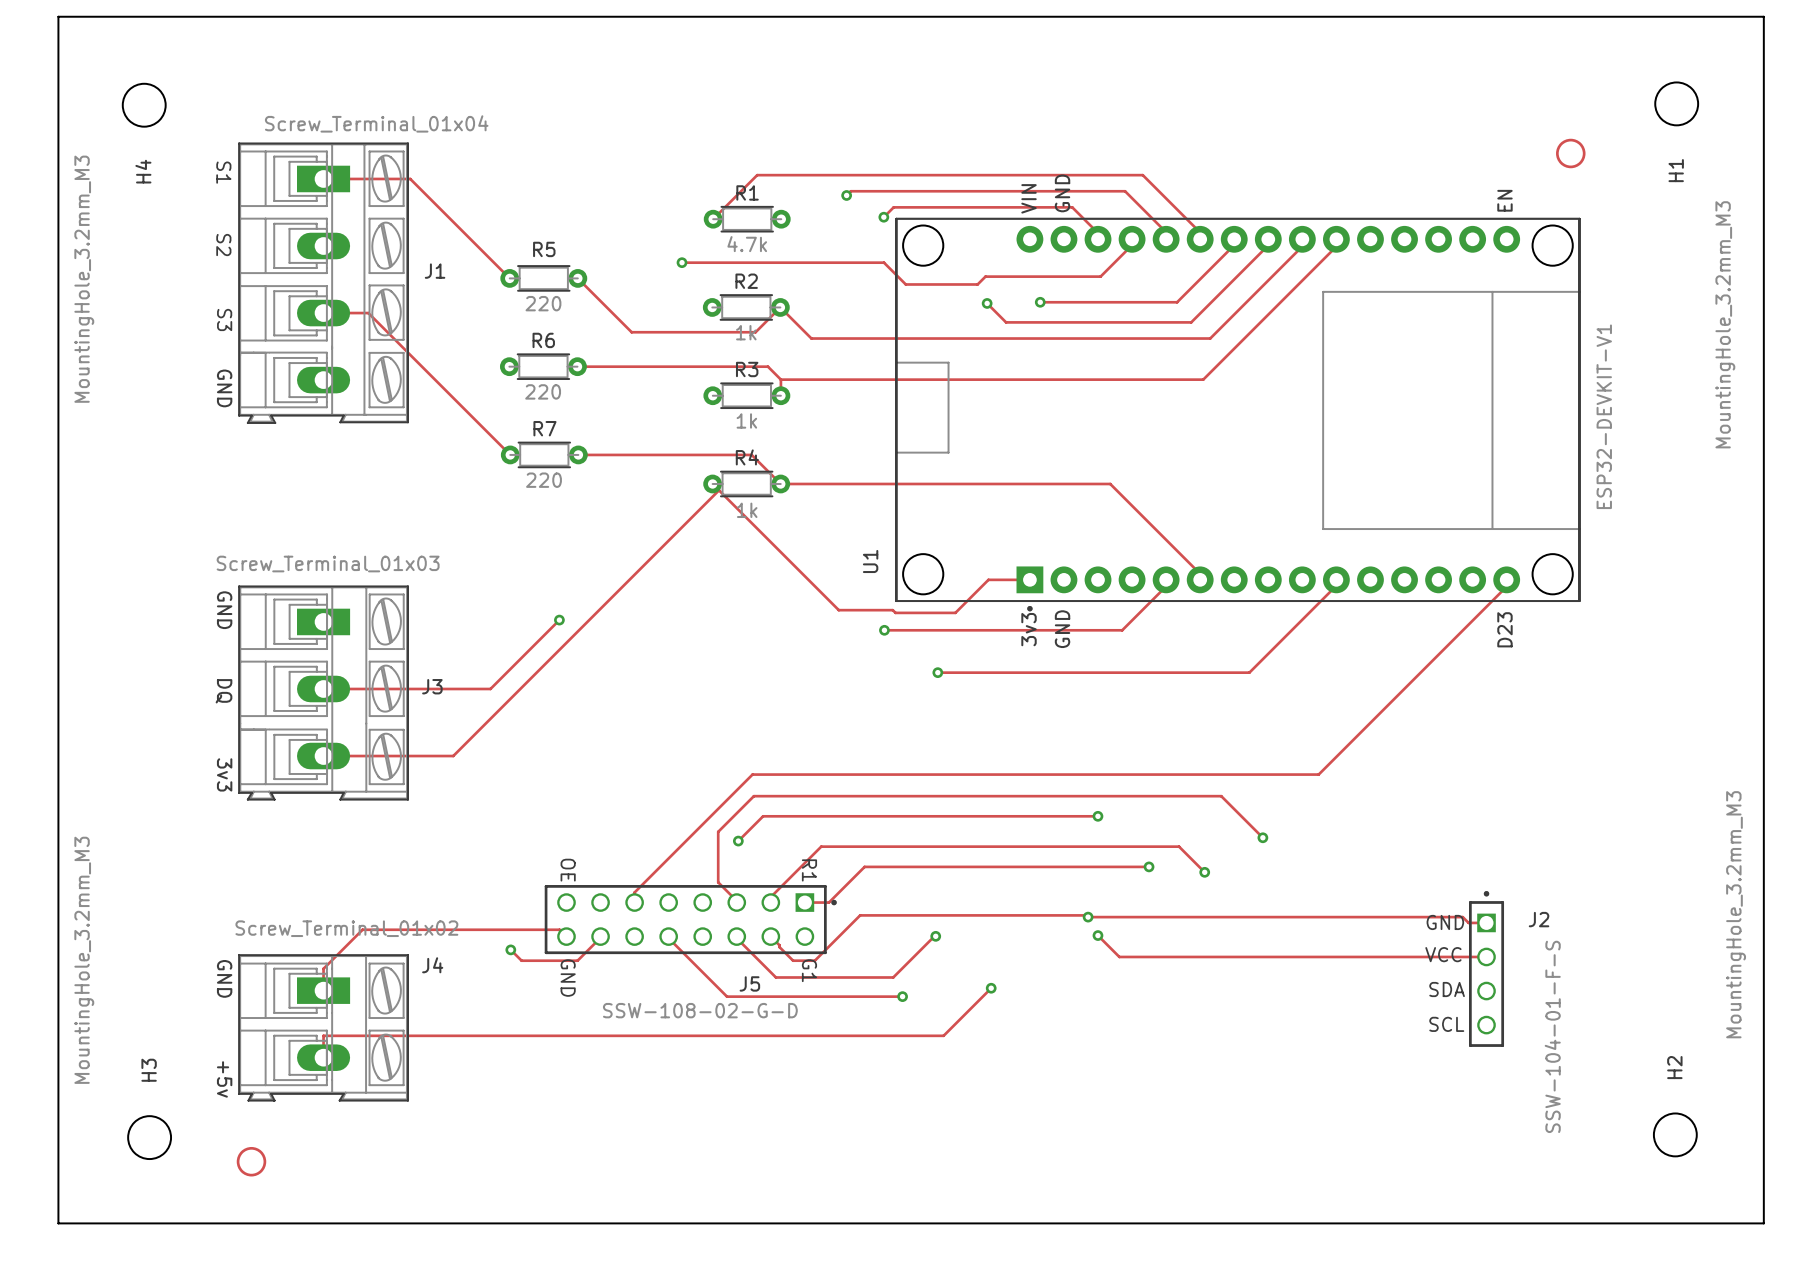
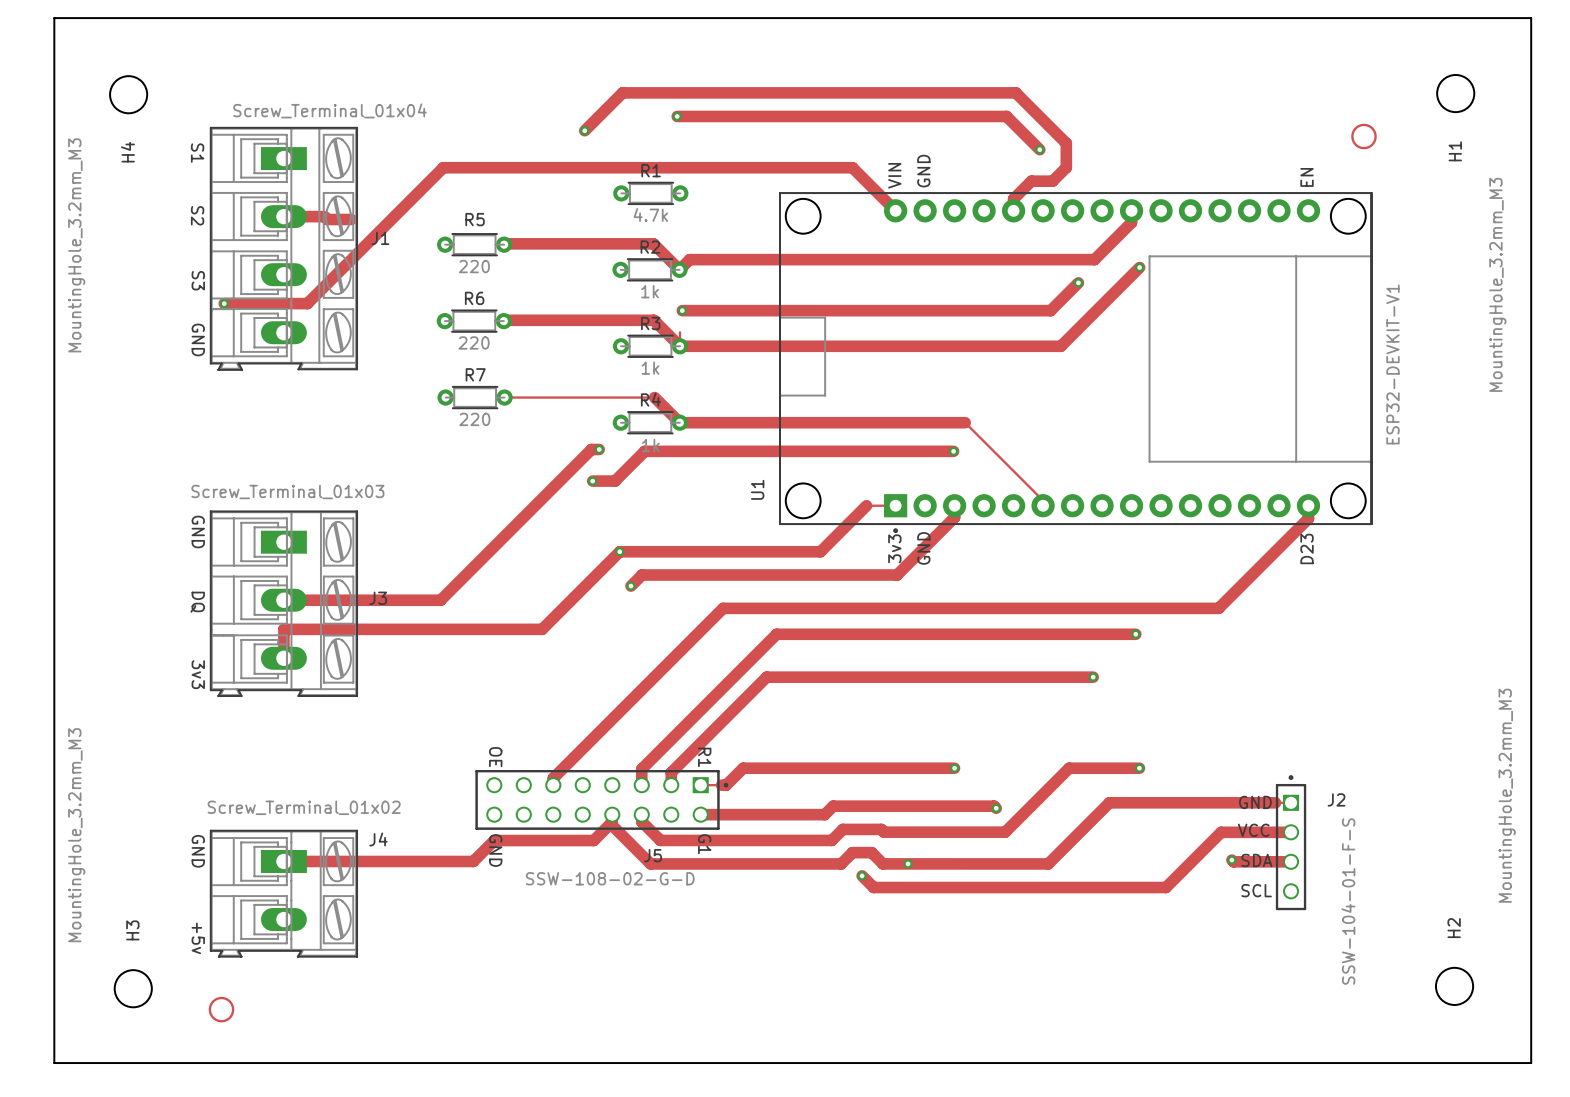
track: none -> (677, 116) (1006, 116) (1039, 149)
via: none -> (677, 116)
via: none -> (584, 130)
via: none -> (1039, 149)
track: (323, 178) (410, 178) (509, 278) -> none
track: (846, 195) (850, 191) (1125, 191) (1166, 232) -> (584, 130) (622, 92) (1015, 92) (1066, 143) (1066, 167) (1052, 181) (1031, 181) (1013, 199) (1013, 204)
via: (846, 195) -> none
track: (883, 217) (893, 207) (1072, 207) (1098, 233) (1098, 239) -> none
via: (883, 217) -> none
track: (713, 219) (757, 175) (1142, 175) (1200, 232) (1200, 239) -> none
track: none -> (895, 210) (852, 167) (443, 167) (307, 303) (224, 303)
track: (1132, 239) (1132, 245) (1100, 276) (985, 276) (977, 284) (905, 284) (884, 262) (682, 262) -> none
track: (1234, 239) (1234, 245) (1177, 302) (1040, 302) -> none
track: (1268, 239) (1268, 245) (1191, 322) (1006, 322) (987, 303) -> none
track: (1336, 239) (1336, 246) (1203, 379) (780, 379) (767, 366) (577, 366) -> (1139, 267) (1060, 346) (680, 346) (654, 320) (503, 321)
track: none -> (283, 216) (324, 216) (327, 219) (351, 219)
track: (1302, 246) (1210, 338) (811, 338) (780, 307) (755, 332) (631, 332) (577, 278) -> (1131, 216) (1131, 222) (1094, 259) (689, 259) (679, 269) (653, 243) (504, 244)
via: (682, 262) -> none
via: (1040, 302) -> none
via: (987, 303) -> none
via: none -> (1139, 267)
track: (323, 313) (368, 313) (510, 454) -> none
track: none -> (1078, 282) (1050, 310) (682, 310)
via: none -> (1078, 282)
via: none -> (224, 303)
via: none -> (682, 310)
track width: thin (751, 454) (780, 483) (1110, 483) -> thick (654, 397) (679, 422) (965, 422)
track: (718, 490) (453, 756) (323, 756) -> (866, 505) (820, 551) (619, 551) (542, 629) (283, 629) (283, 658)
track: (718, 490) (838, 610) (955, 612) (988, 579) (996, 579) -> none
via: none -> (599, 449)
track: none -> (953, 451) (644, 451) (615, 481) (592, 481)
via: none -> (953, 451)
via: none -> (592, 481)
track: none -> (954, 505) (954, 517) (897, 575) (642, 575) (630, 586)
track: (1166, 579) (1166, 586) (1122, 630) (884, 630) -> none
track: (1336, 579) (1336, 585) (1249, 672) (937, 672) -> none
track: (1506, 586) (1318, 774) (752, 774) (634, 894) -> (1308, 511) (1308, 518) (1218, 608) (723, 608) (553, 778)
track: (559, 620) (490, 688) -> (599, 449) (591, 449) (440, 600) (428, 600)
via: (559, 620) -> none
via: (884, 630) -> none
via: none -> (619, 551)
via: none -> (630, 586)
via: (937, 672) -> none
track width: thin (323, 688) (490, 688) -> thick (283, 600) (428, 600)
via: none -> (1135, 634)
via: none -> (1093, 677)
track: (1097, 816) (763, 816) (738, 841) -> none
via: (1097, 816) -> none
track: (1262, 837) (1221, 796) (753, 796) (718, 831) (718, 882) (736, 900) -> (1135, 634) (776, 634) (641, 769) (641, 783)
via: (1262, 837) -> none
via: (738, 841) -> none
track: (1149, 866) (864, 866) (828, 902) -> (954, 768) (743, 768) (726, 785) (721, 785)
via: (1149, 866) -> none
track: (1204, 872) (1179, 846) (821, 846) (770, 897) -> (1093, 677) (766, 677) (671, 772) (671, 780)
via: (1204, 872) -> none
via: none -> (954, 768)
via: none -> (1139, 768)
via: (1088, 917) -> none
track: (1468, 922) (1462, 917) (860, 915) (814, 960) (793, 960) (770, 936) -> (1275, 802) (1109, 802) (1048, 863) (882, 863) (871, 852) (852, 852) (841, 863) (650, 863) (610, 823)
track: none -> (996, 808) (994, 806) (833, 806) (824, 814) (700, 814)
via: none -> (996, 808)
track: (1097, 935) (1119, 956) (1405, 956) -> (862, 875) (873, 887) (1166, 887) (1221, 832)
via: (1097, 935) -> none
track: (566, 936) (559, 929) (362, 929) (323, 968) (323, 990) -> (612, 814) (612, 822) (593, 840) (494, 840) (473, 861) (283, 861)
track: (600, 936) (577, 960) (521, 960) (510, 949) -> none
track: (668, 936) (727, 996) (902, 996) -> none
track: (935, 936) (893, 977) (775, 977) (736, 938) -> (1139, 768) (1069, 768) (1005, 832) (884, 832) (881, 829) (842, 829) (831, 840) (660, 840) (641, 821) (641, 816)
via: (935, 936) -> none
via: (510, 949) -> none
track width: thin (1405, 956) (1486, 956) -> thick (1221, 832) (1291, 832)
track: (991, 988) (943, 1035) (323, 1035) (323, 1057) -> none
via position: (991, 988) -> (862, 875)
track: none -> (1231, 860) (1233, 861) (1291, 861)
via: none -> (1231, 860)
via: none -> (908, 863)
via: (902, 996) -> none

